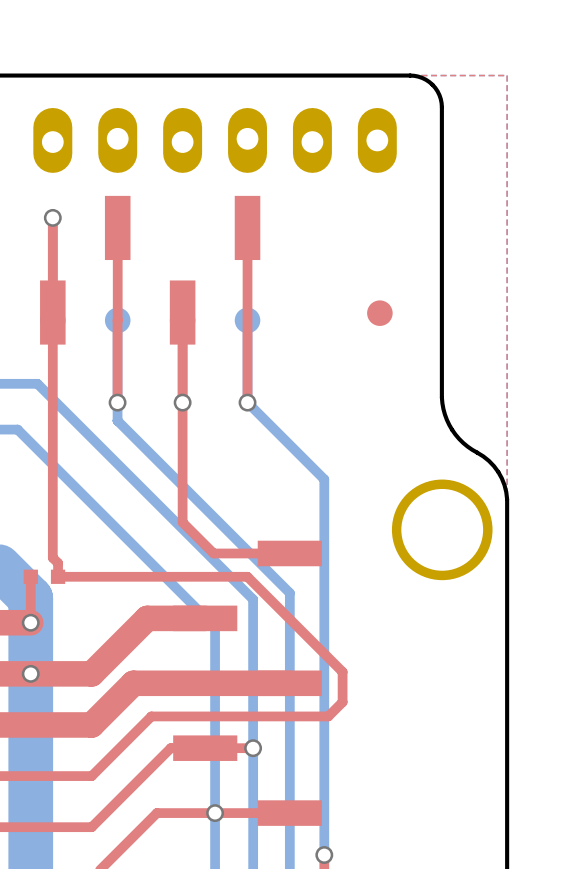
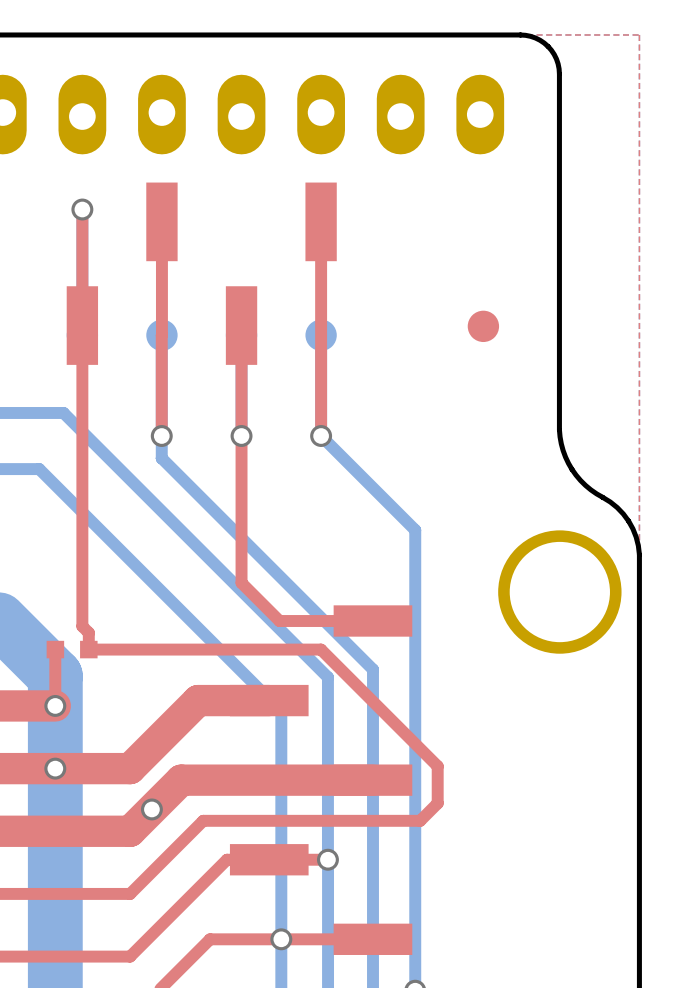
via: none -> (151, 809)

